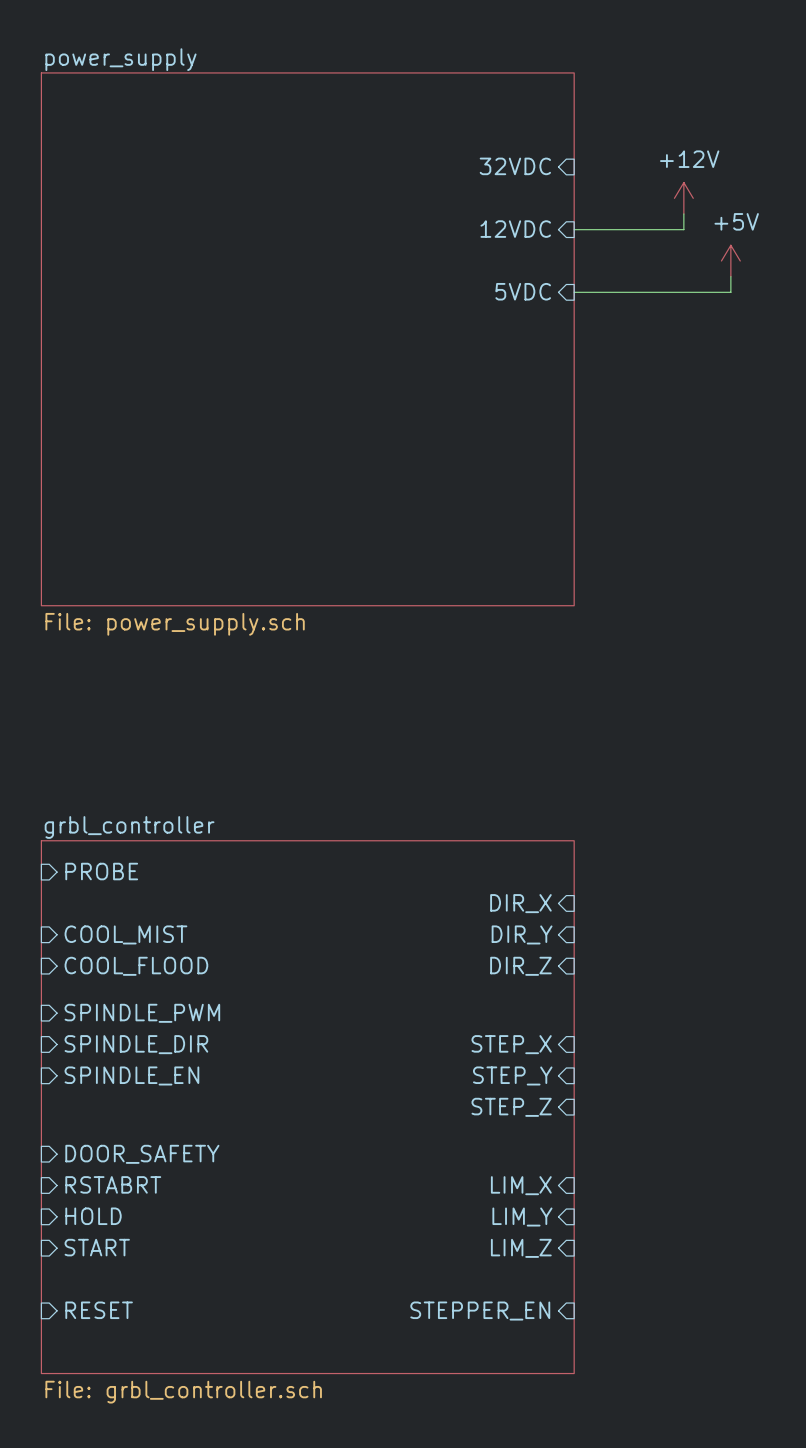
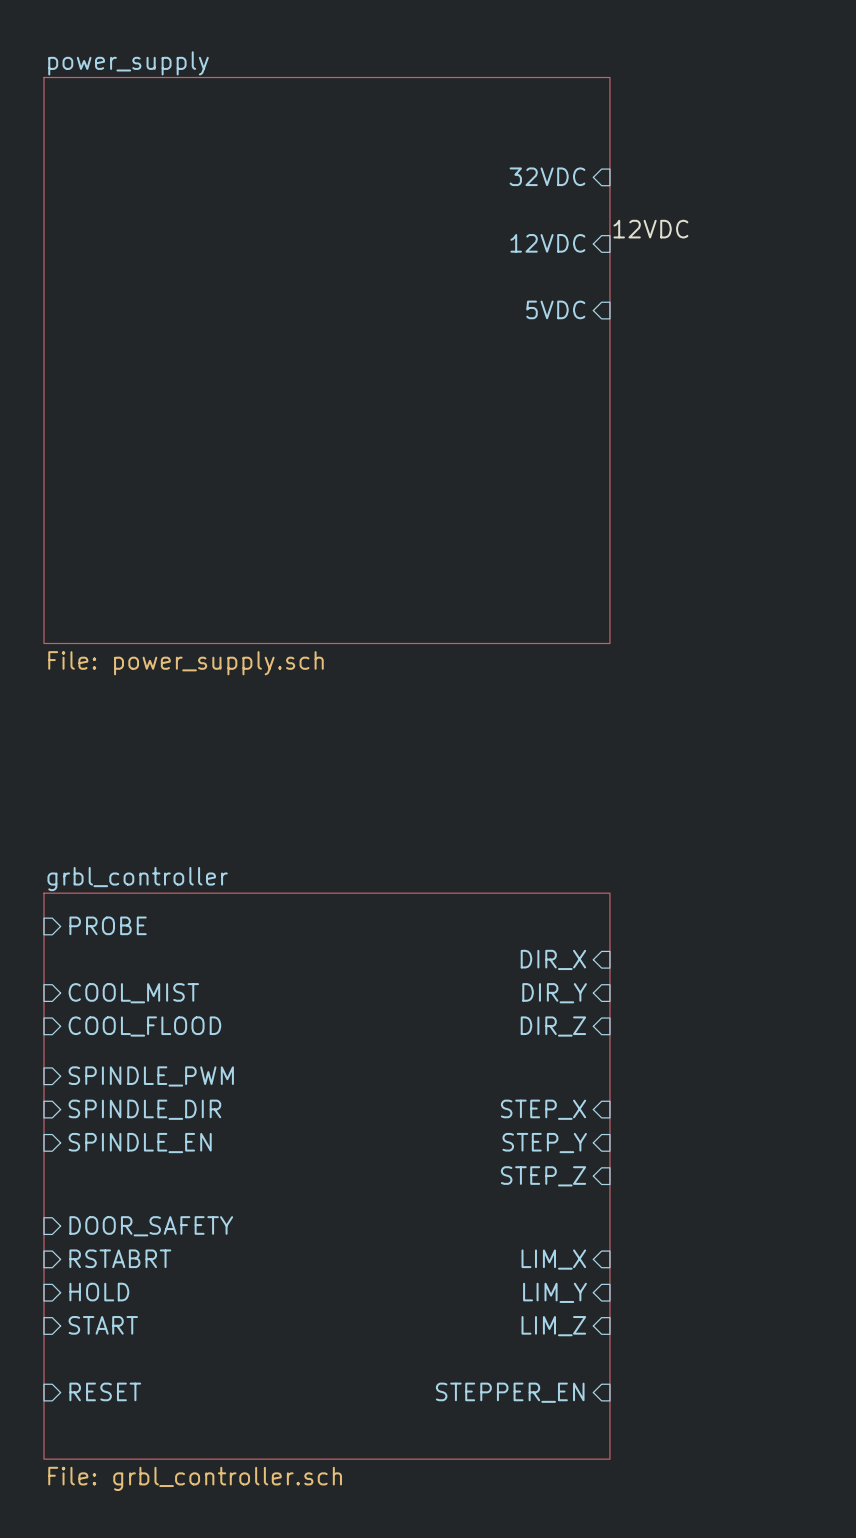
power symbol: +12V (683, 198) -> none
wire: (683, 213) (683, 229) (574, 229) -> none
label: none -> 12VDC (650, 229)
power symbol: +5V (730, 260) -> none
wire: (730, 276) (730, 292) (574, 292) -> none

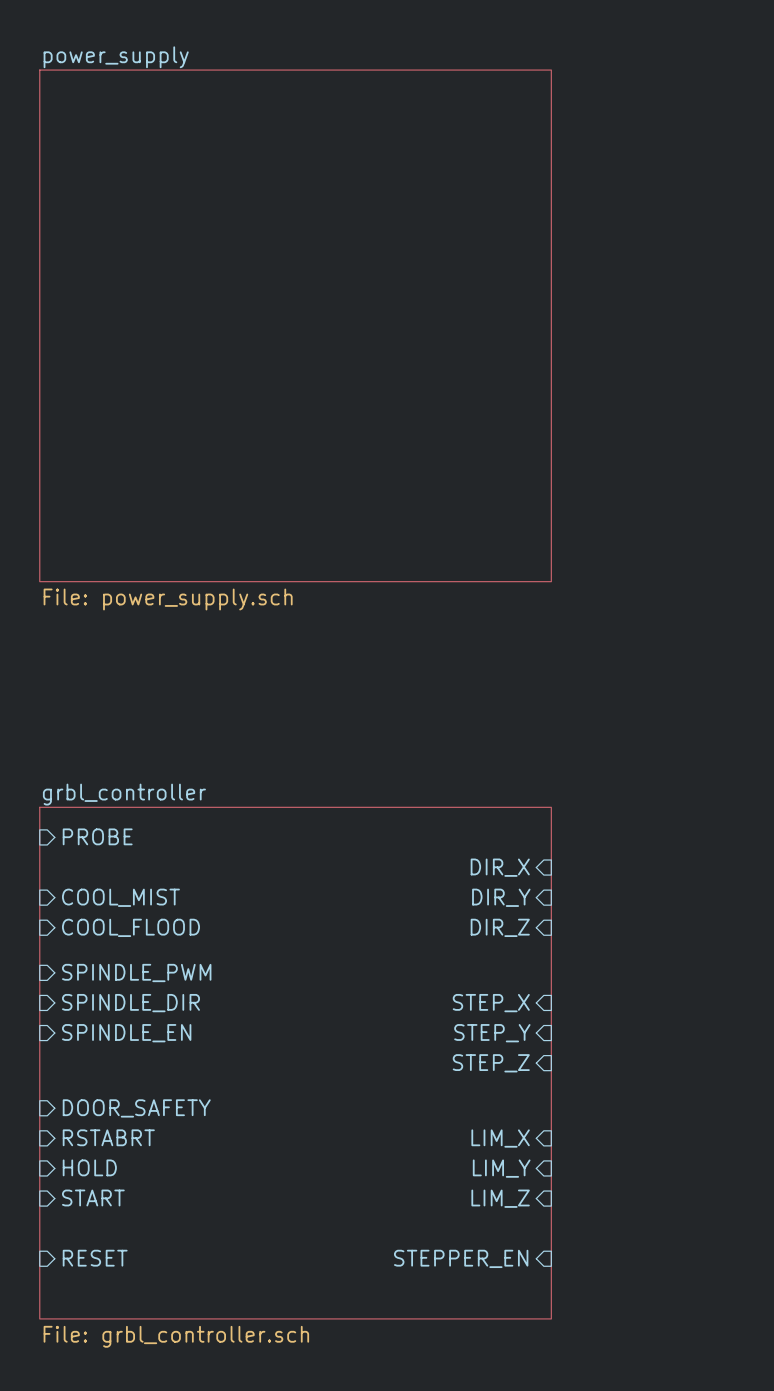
sheet pin: 32VDC (547, 176) -> none
label: 12VDC (650, 229) -> none
sheet pin: 12VDC (547, 243) -> none
sheet pin: 5VDC (555, 309) -> none

